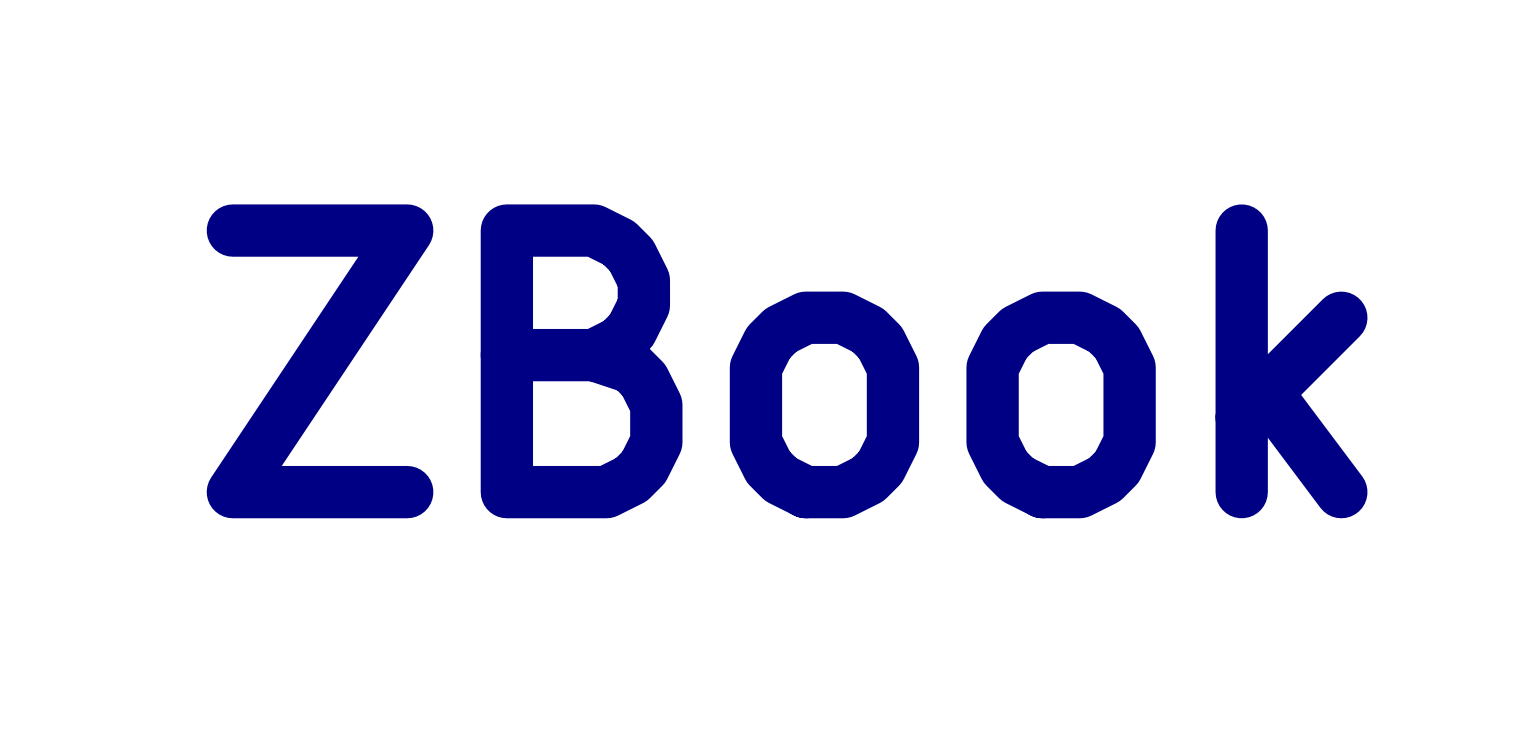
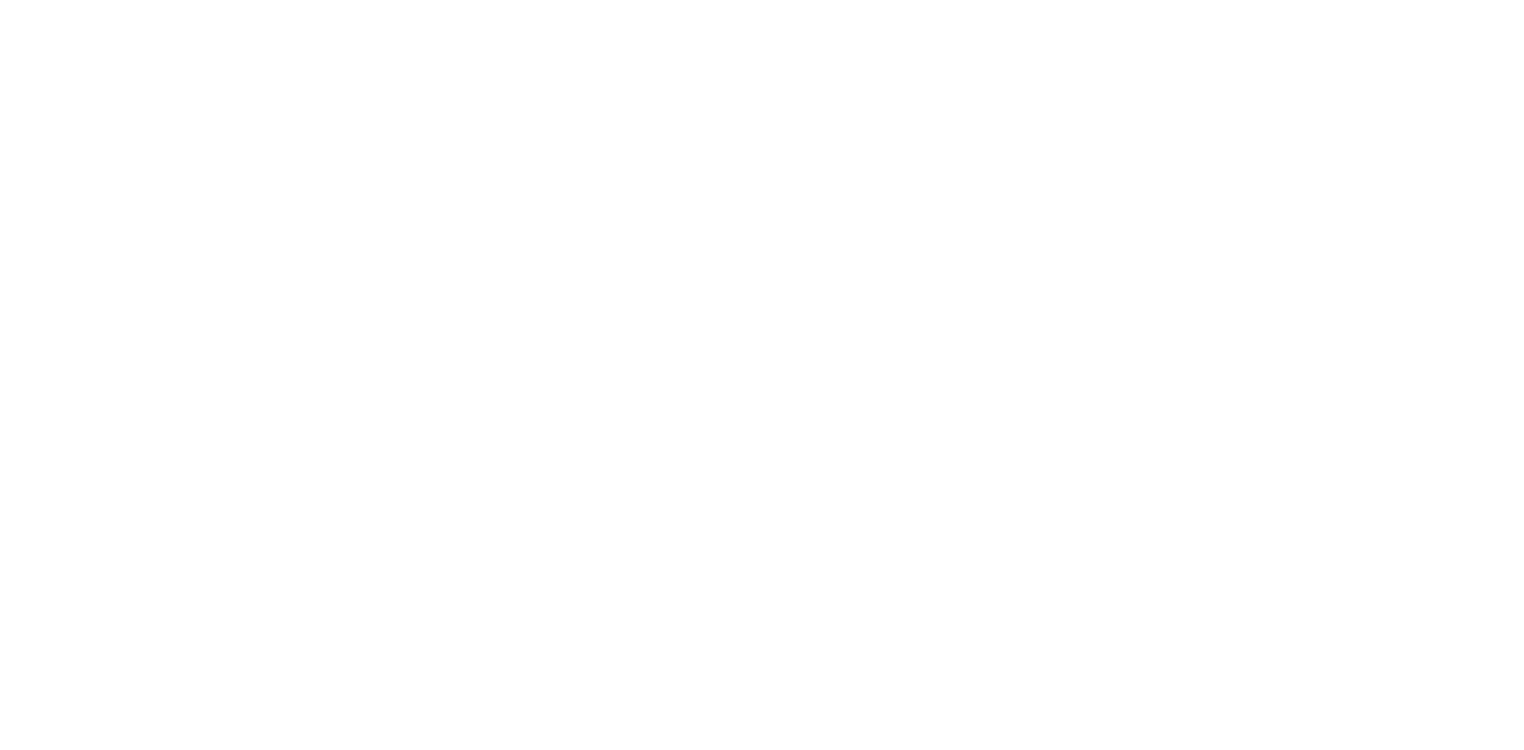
text: ZBook (787, 361) -> none

